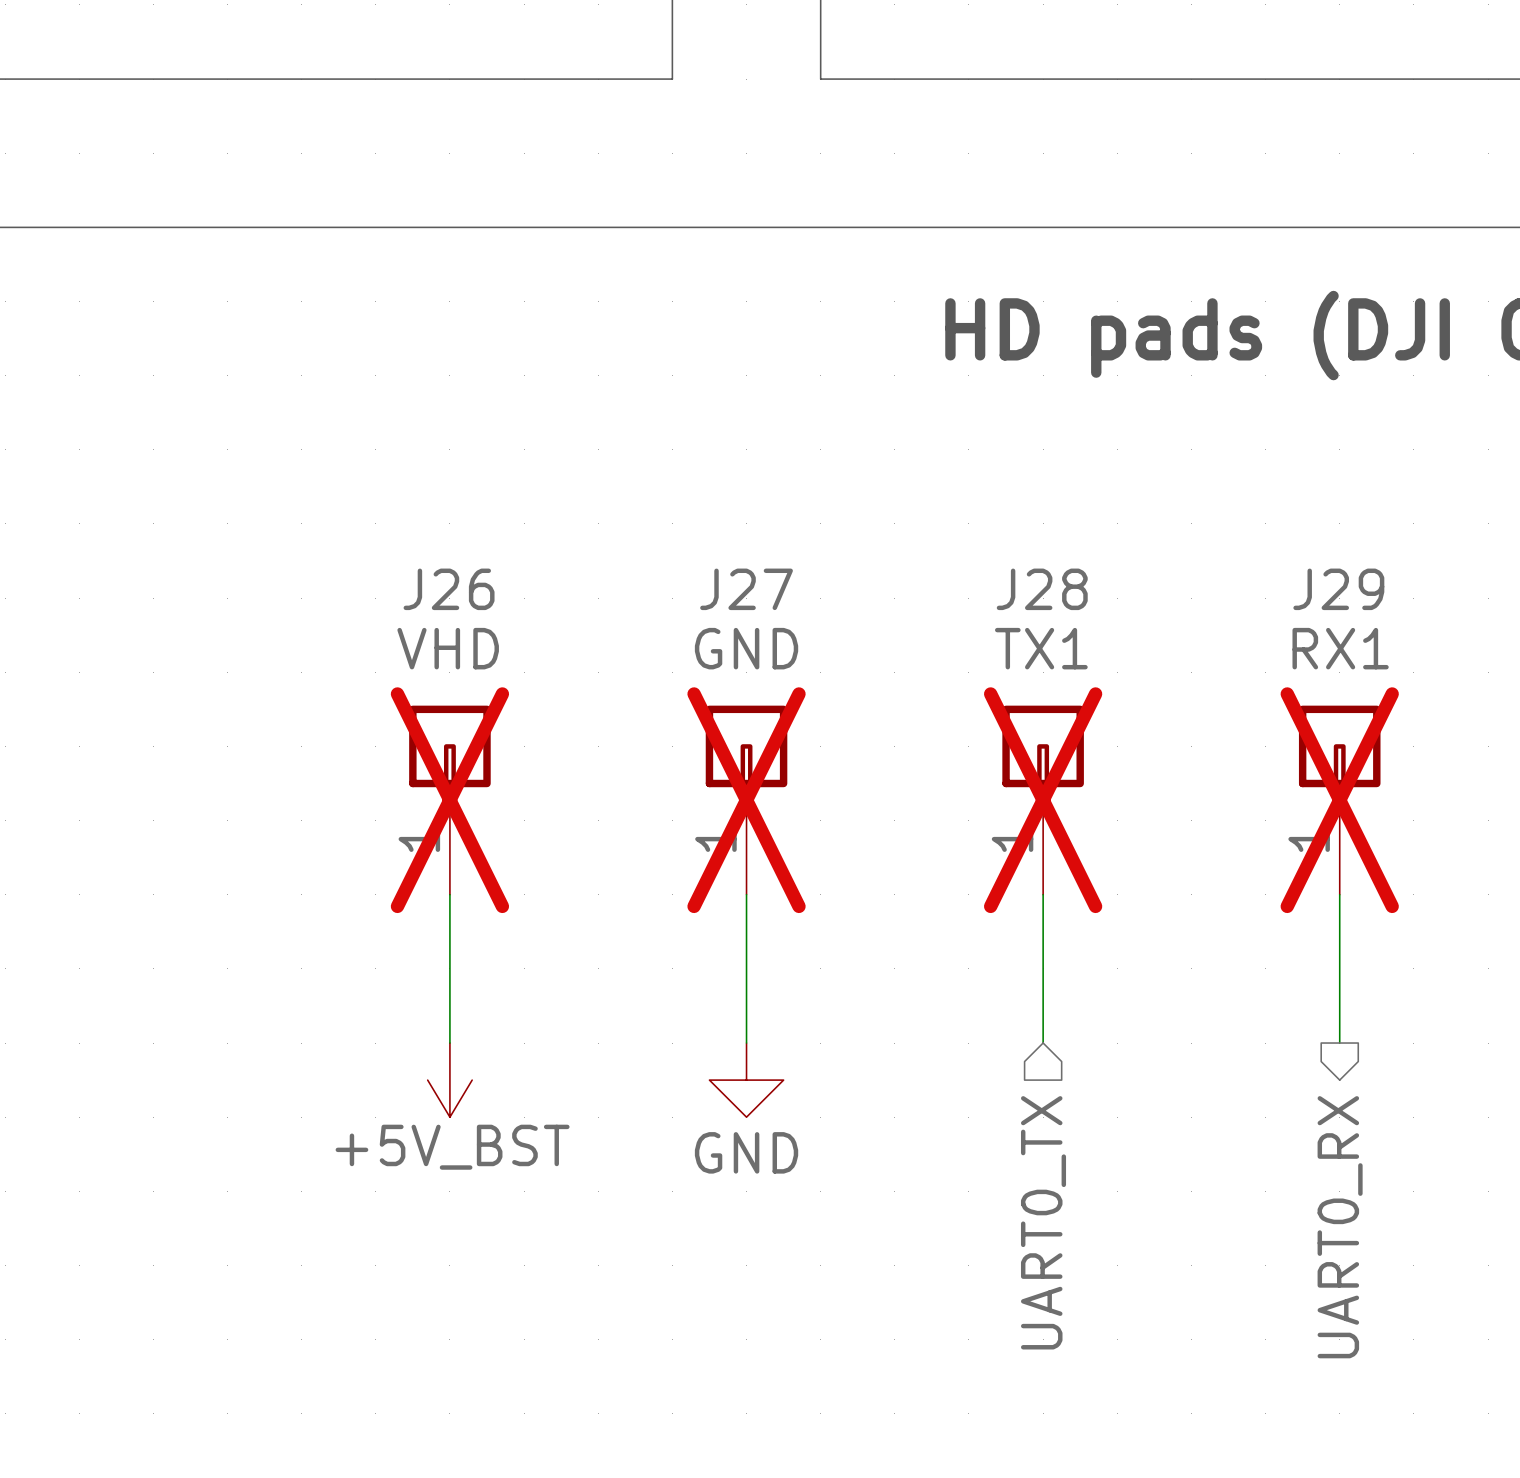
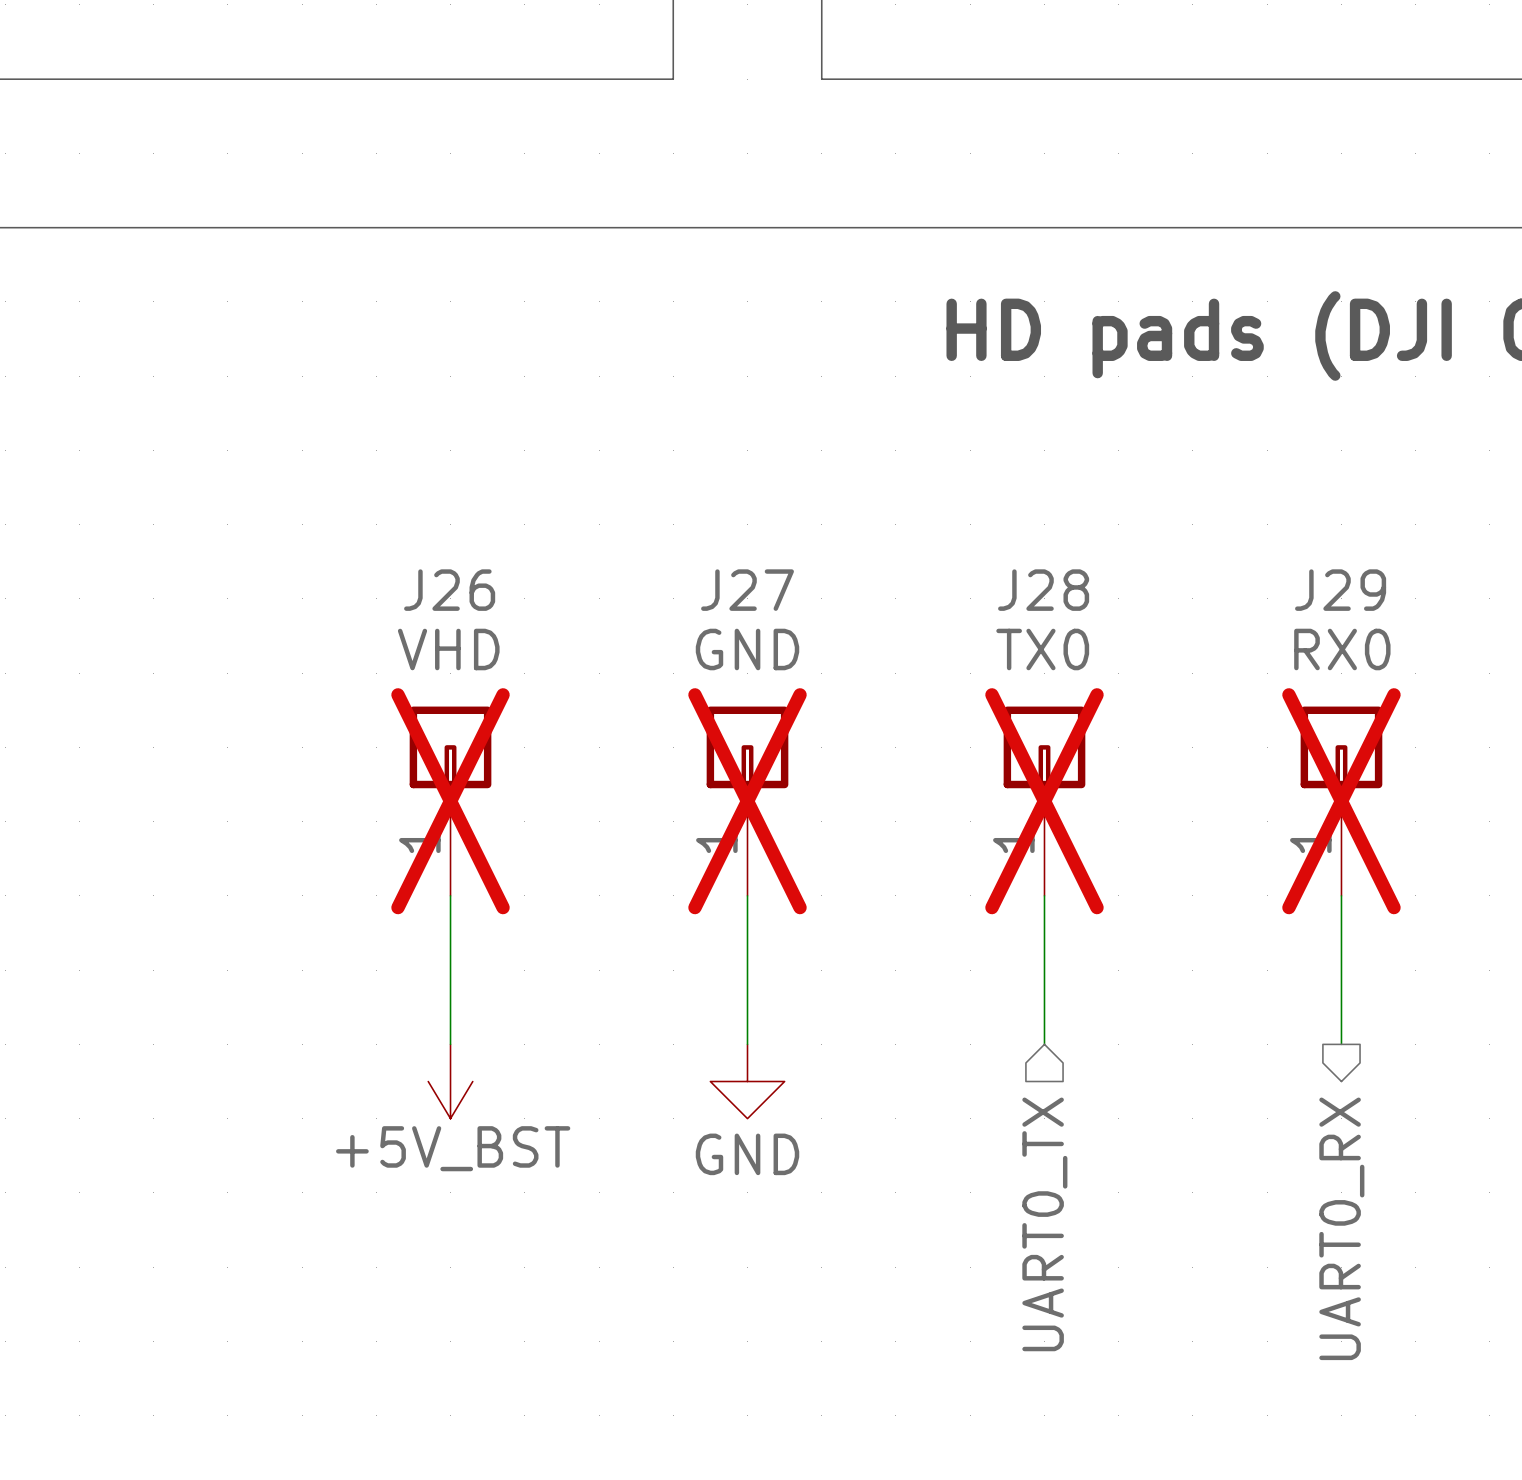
J28 value: TX1 (1041, 648) -> TX0 (1042, 649)
J29 value: RX1 (1340, 648) -> RX0 (1342, 649)

